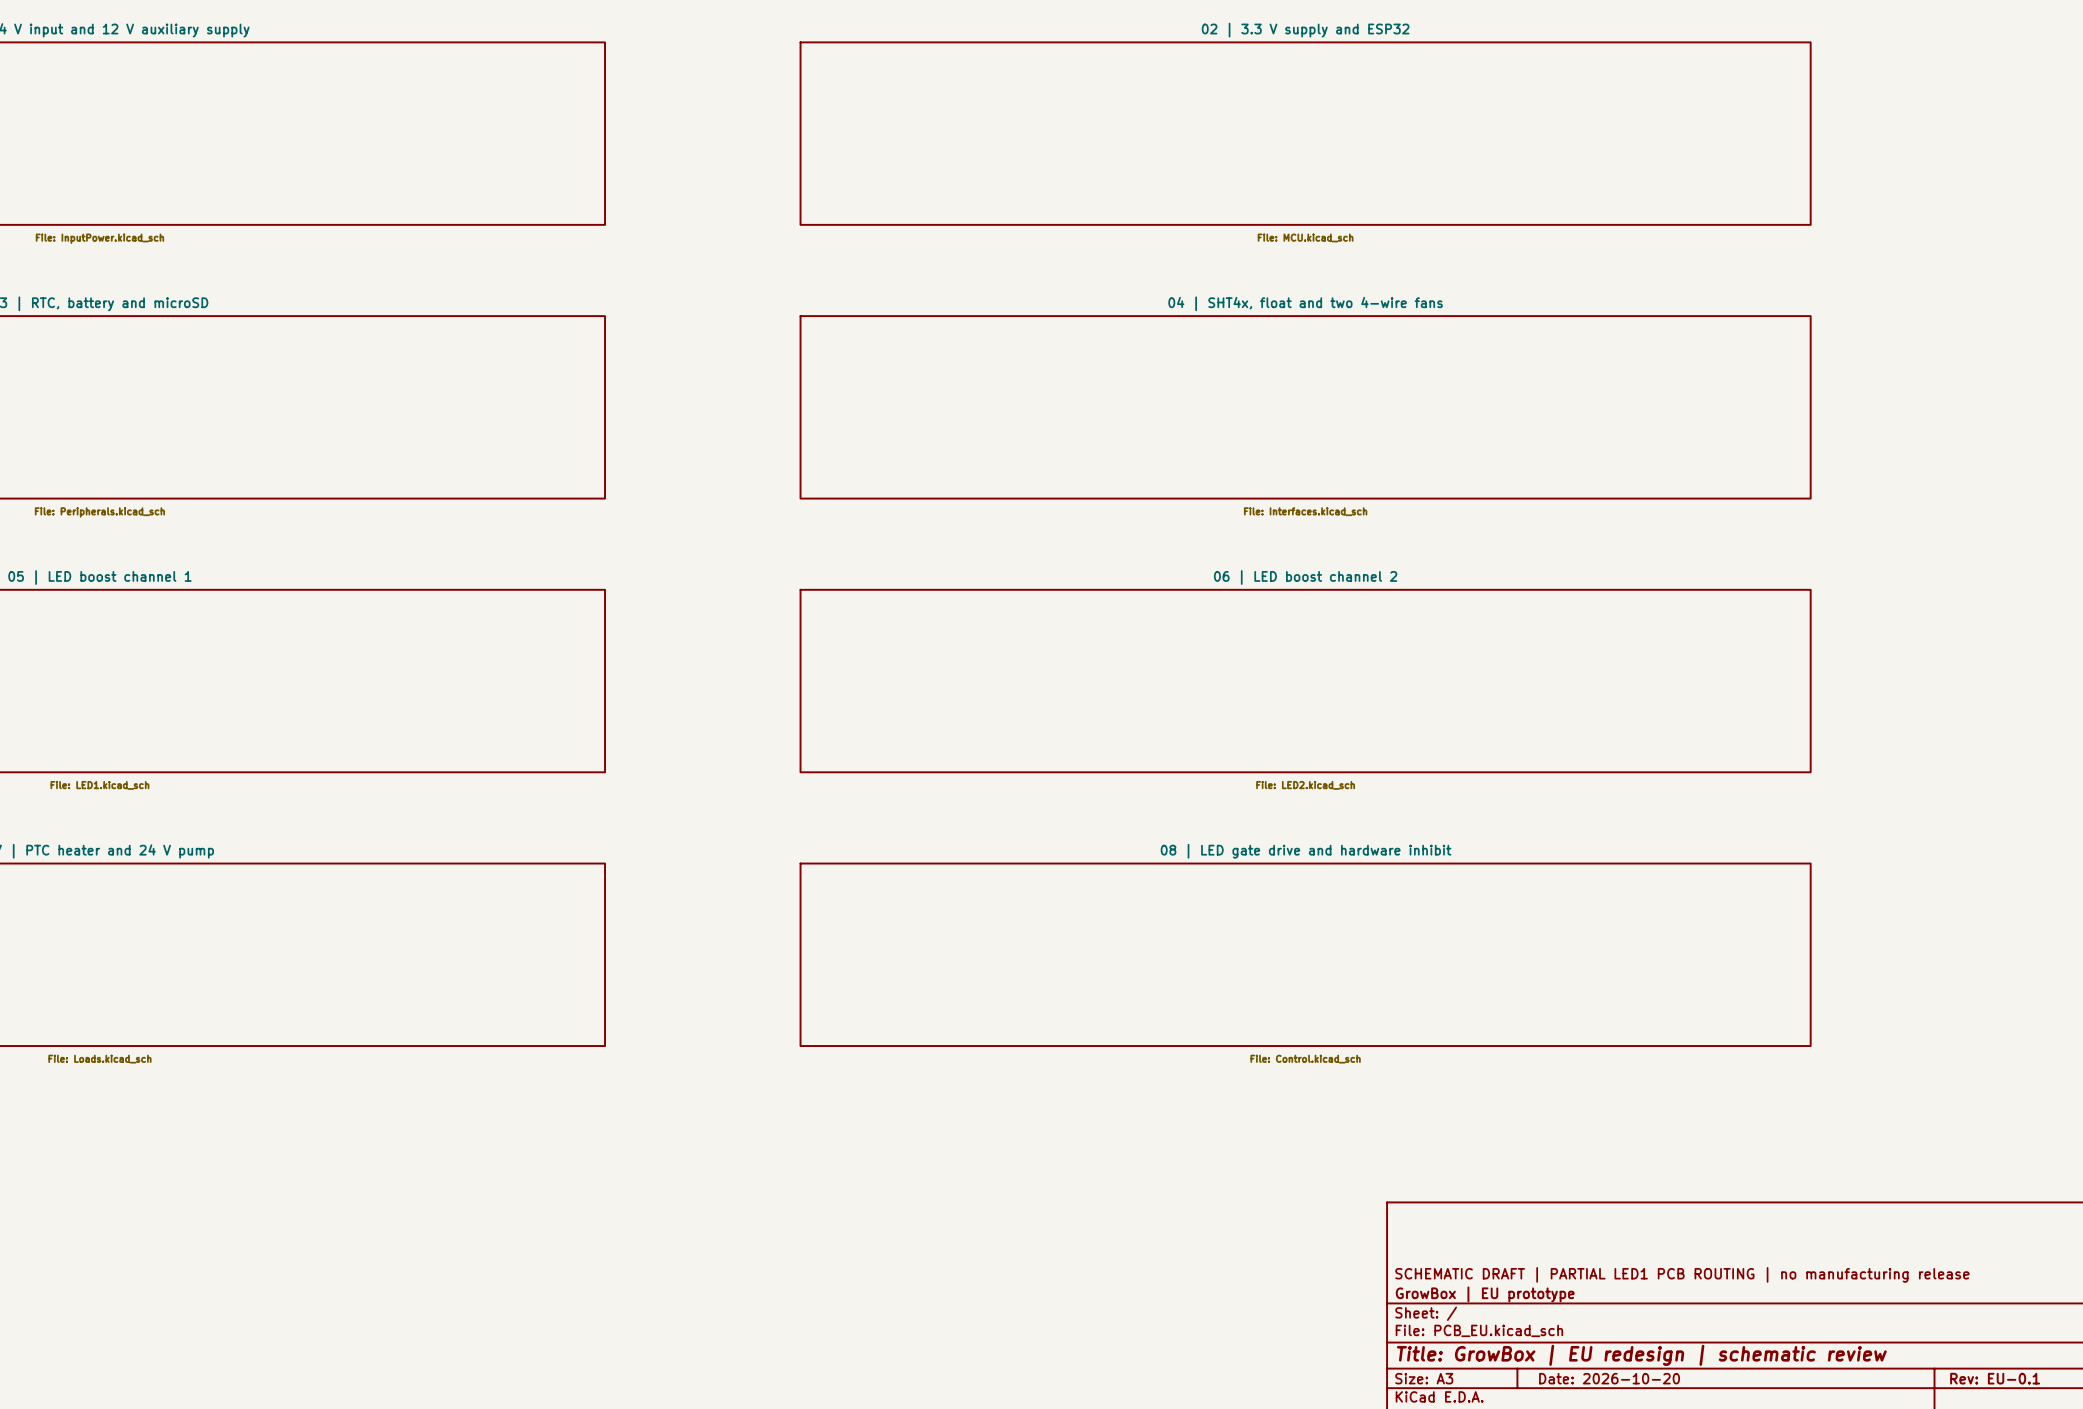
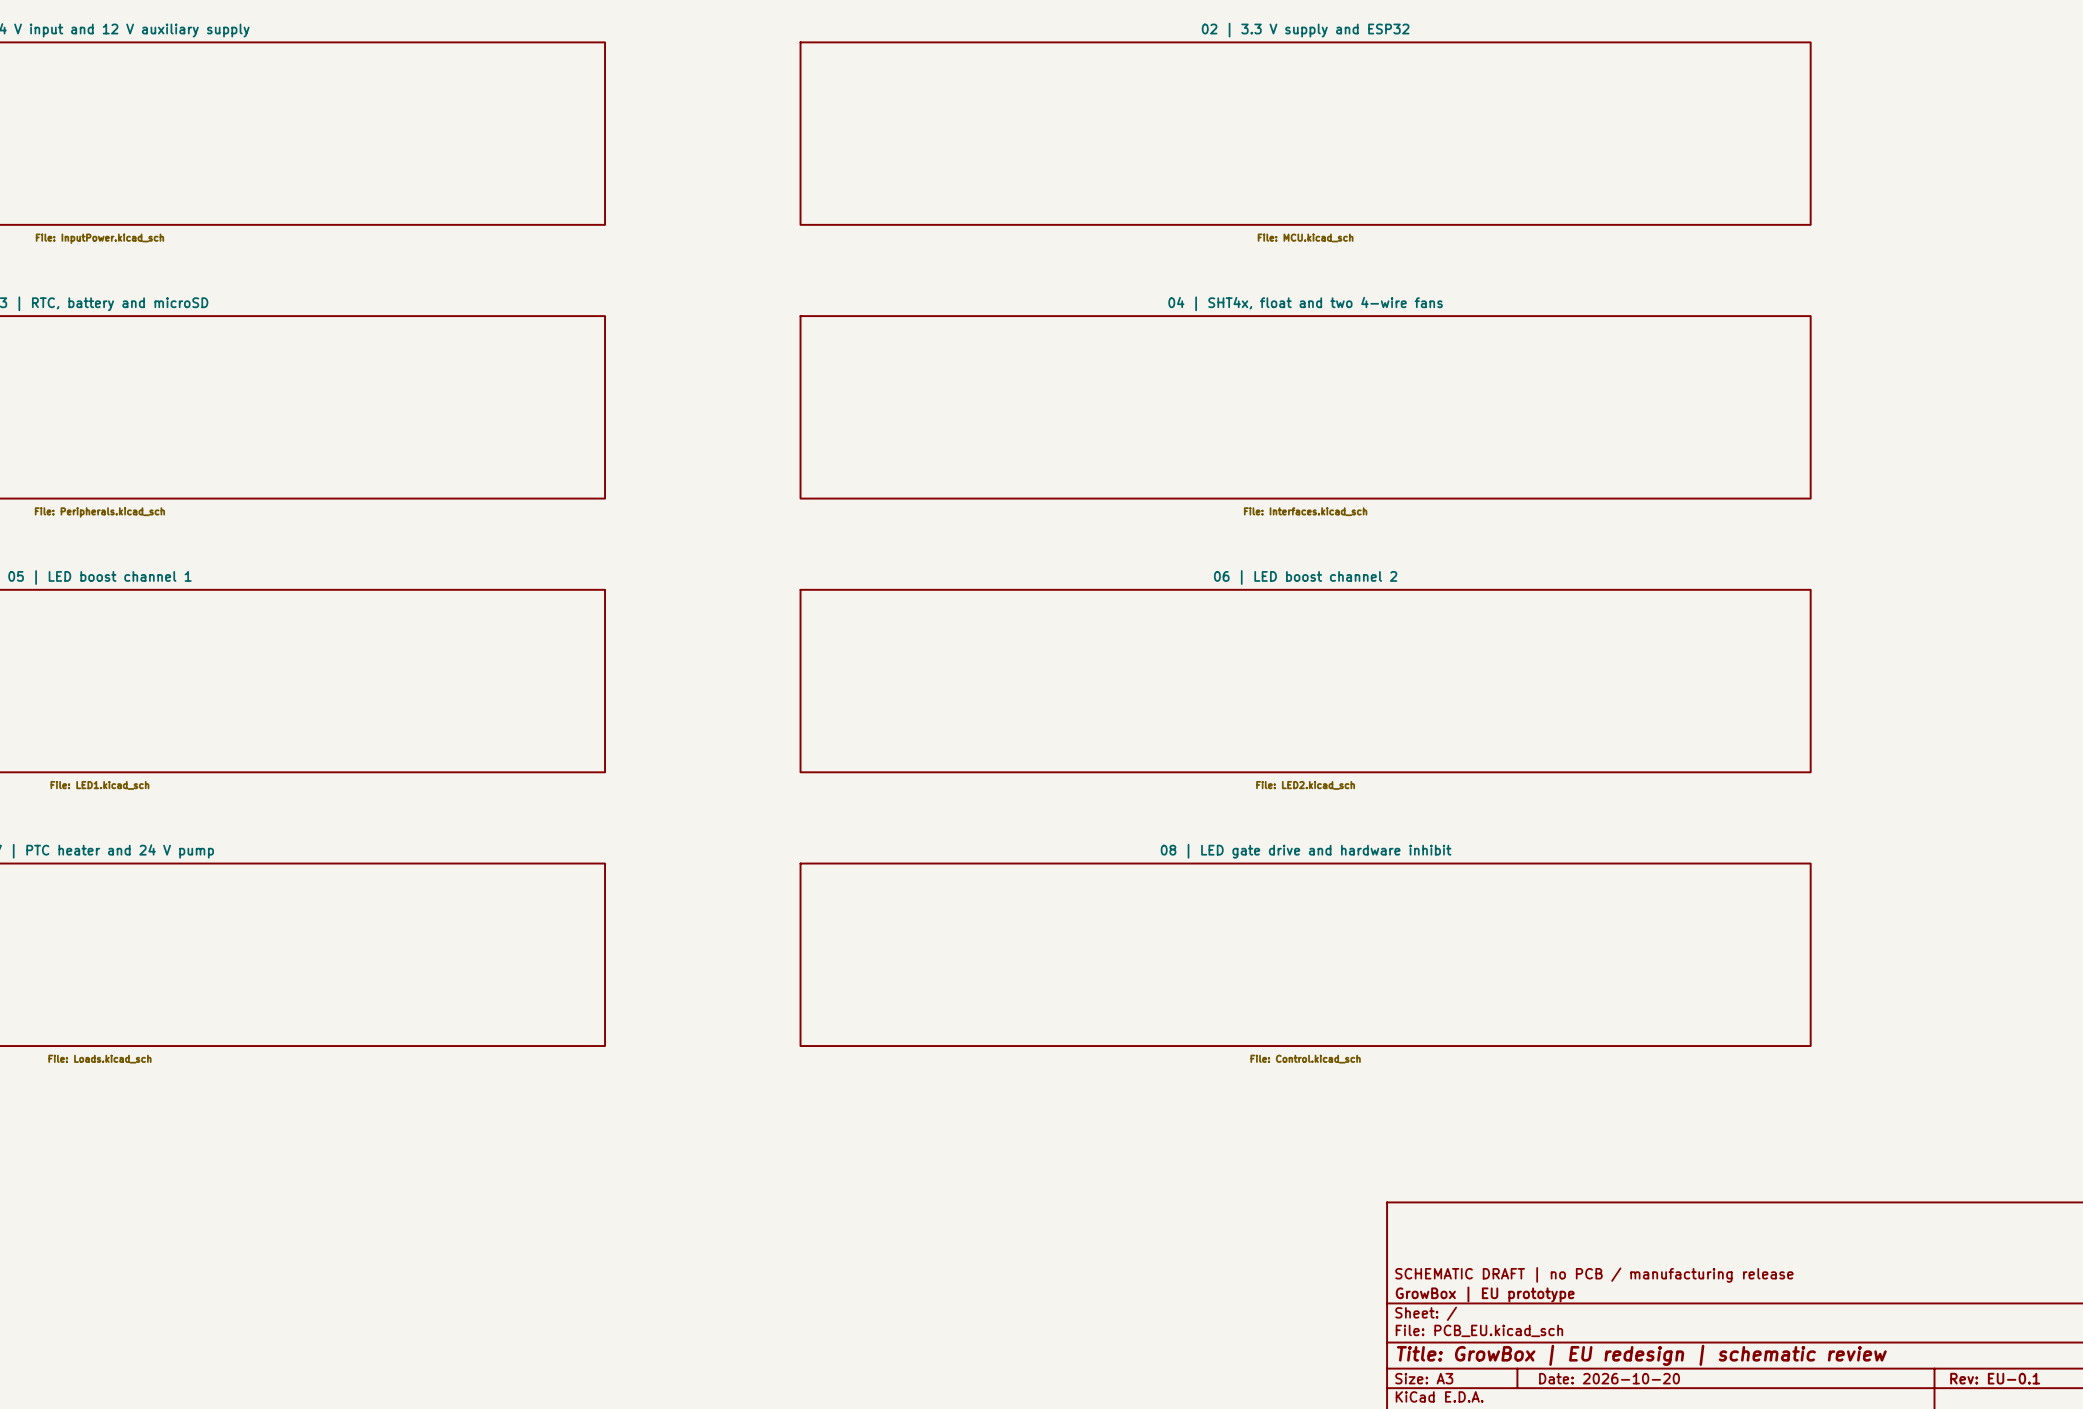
title block: SCHEMATIC DRAFT | PARTIAL LED1 PCB ROUTING | no manufacturing release (1682, 1274) -> SCHEMATIC DRAFT | no PCB / manufacturing release (1594, 1274)

